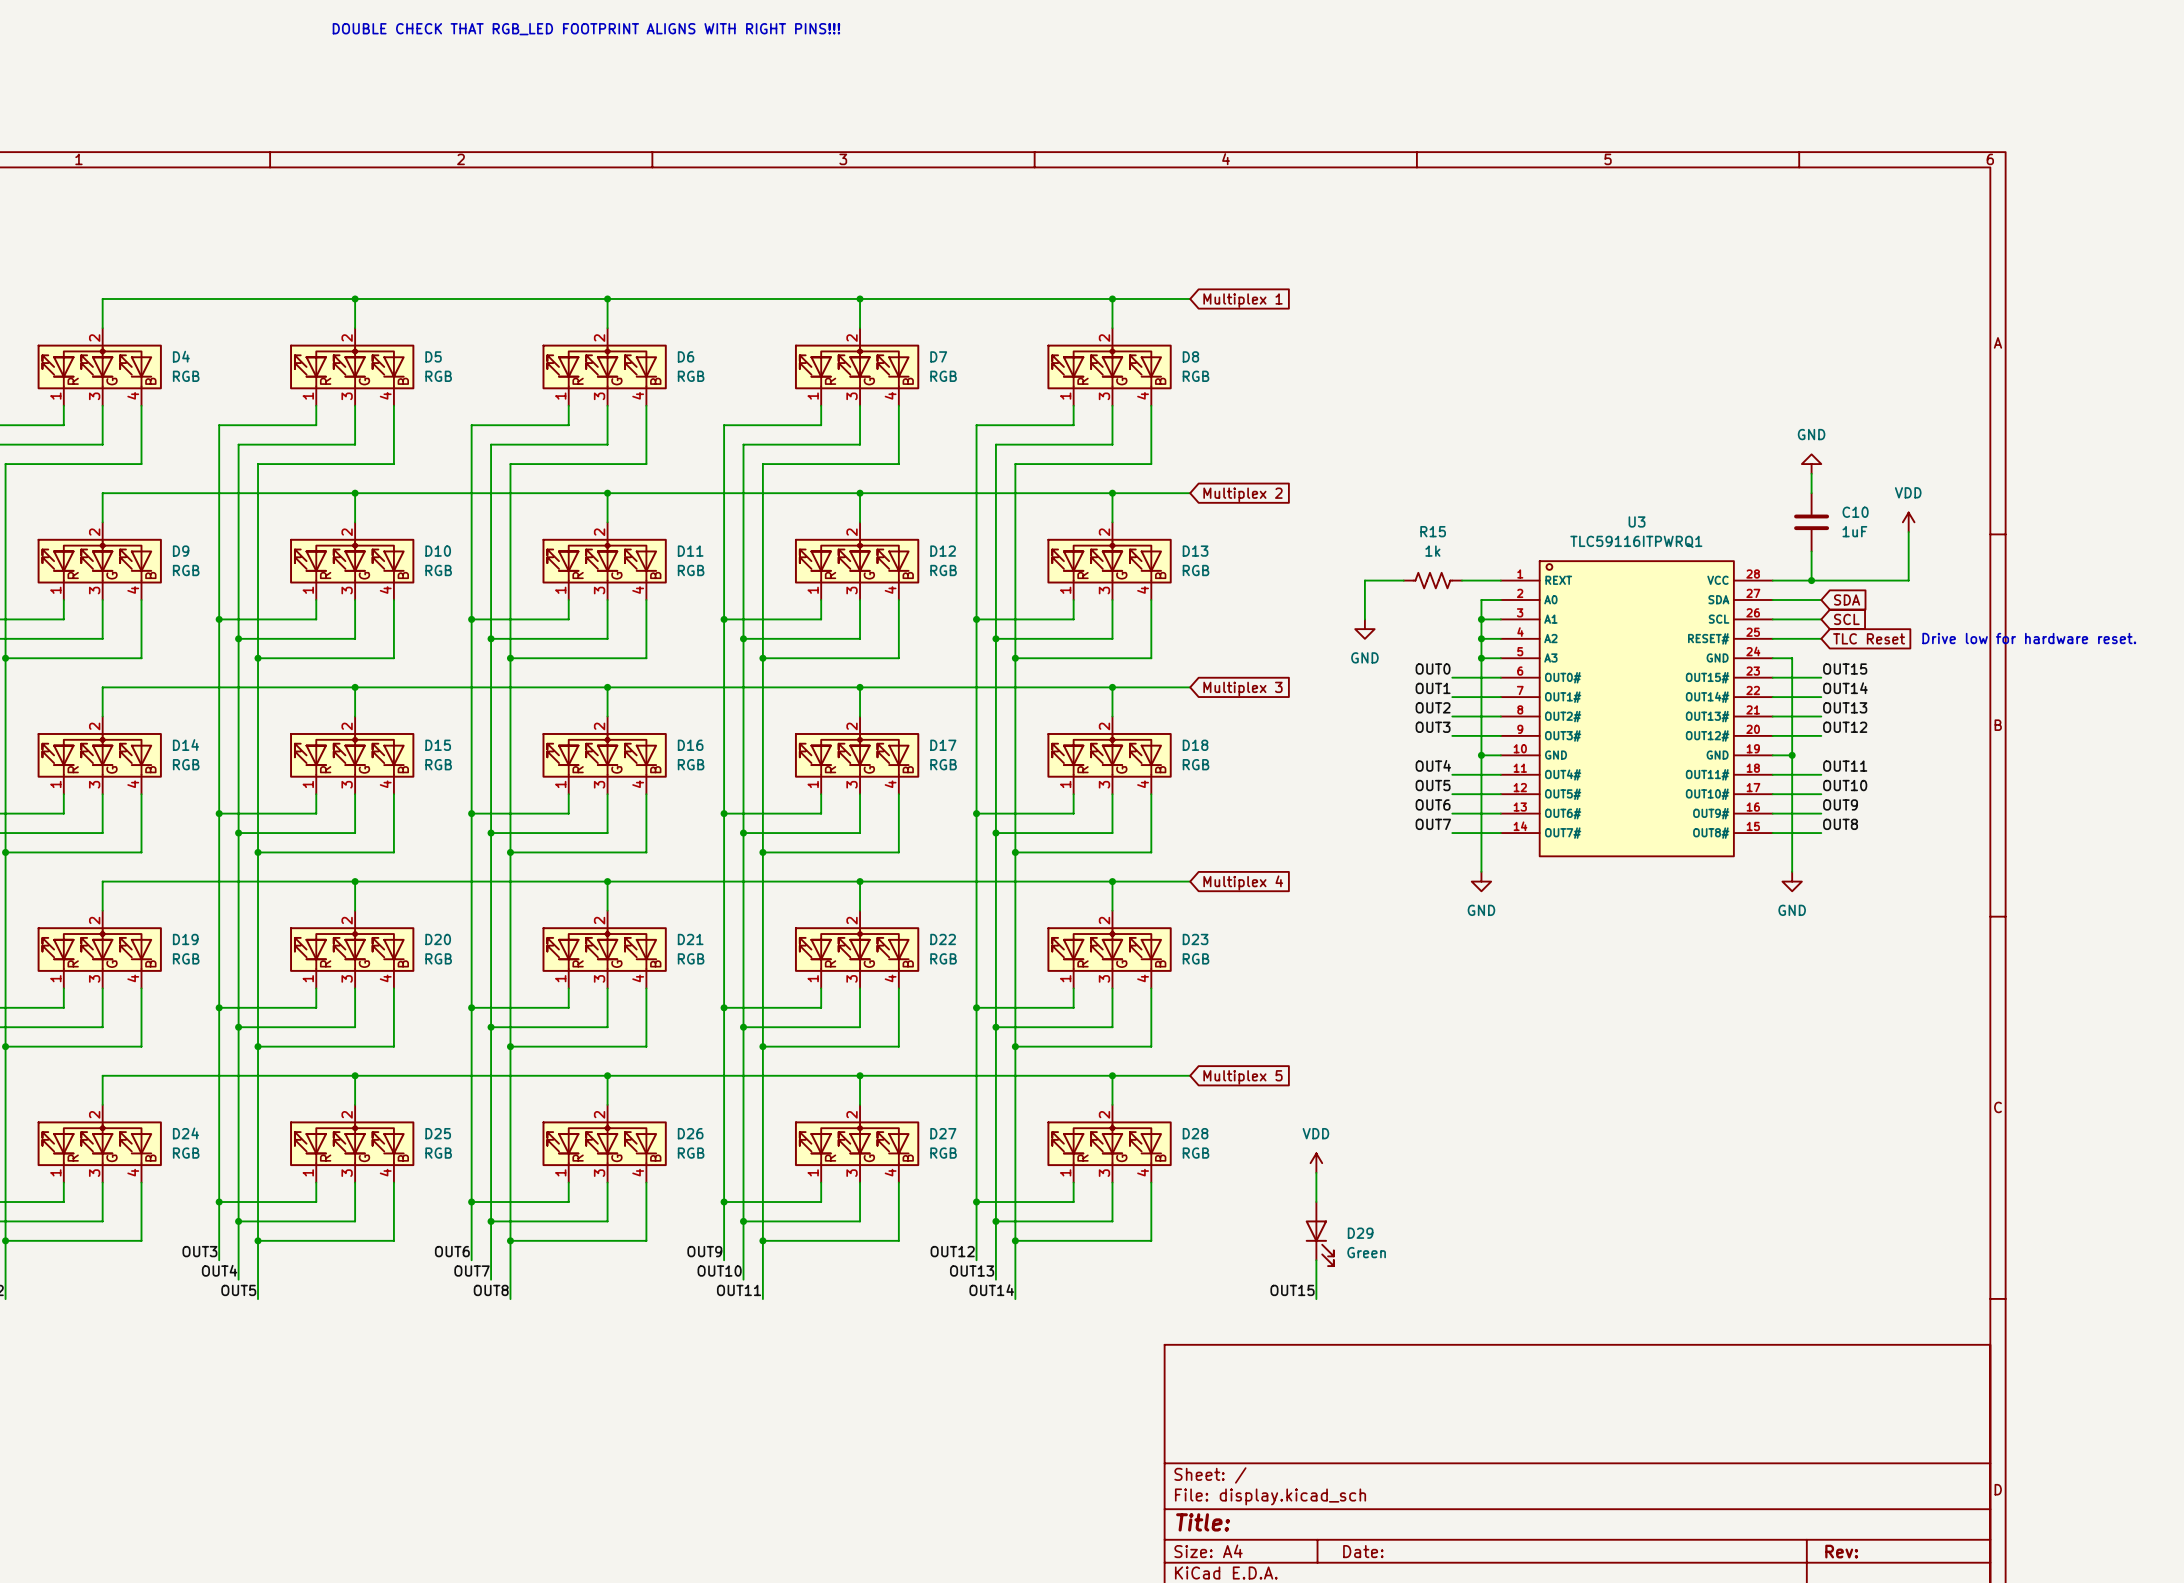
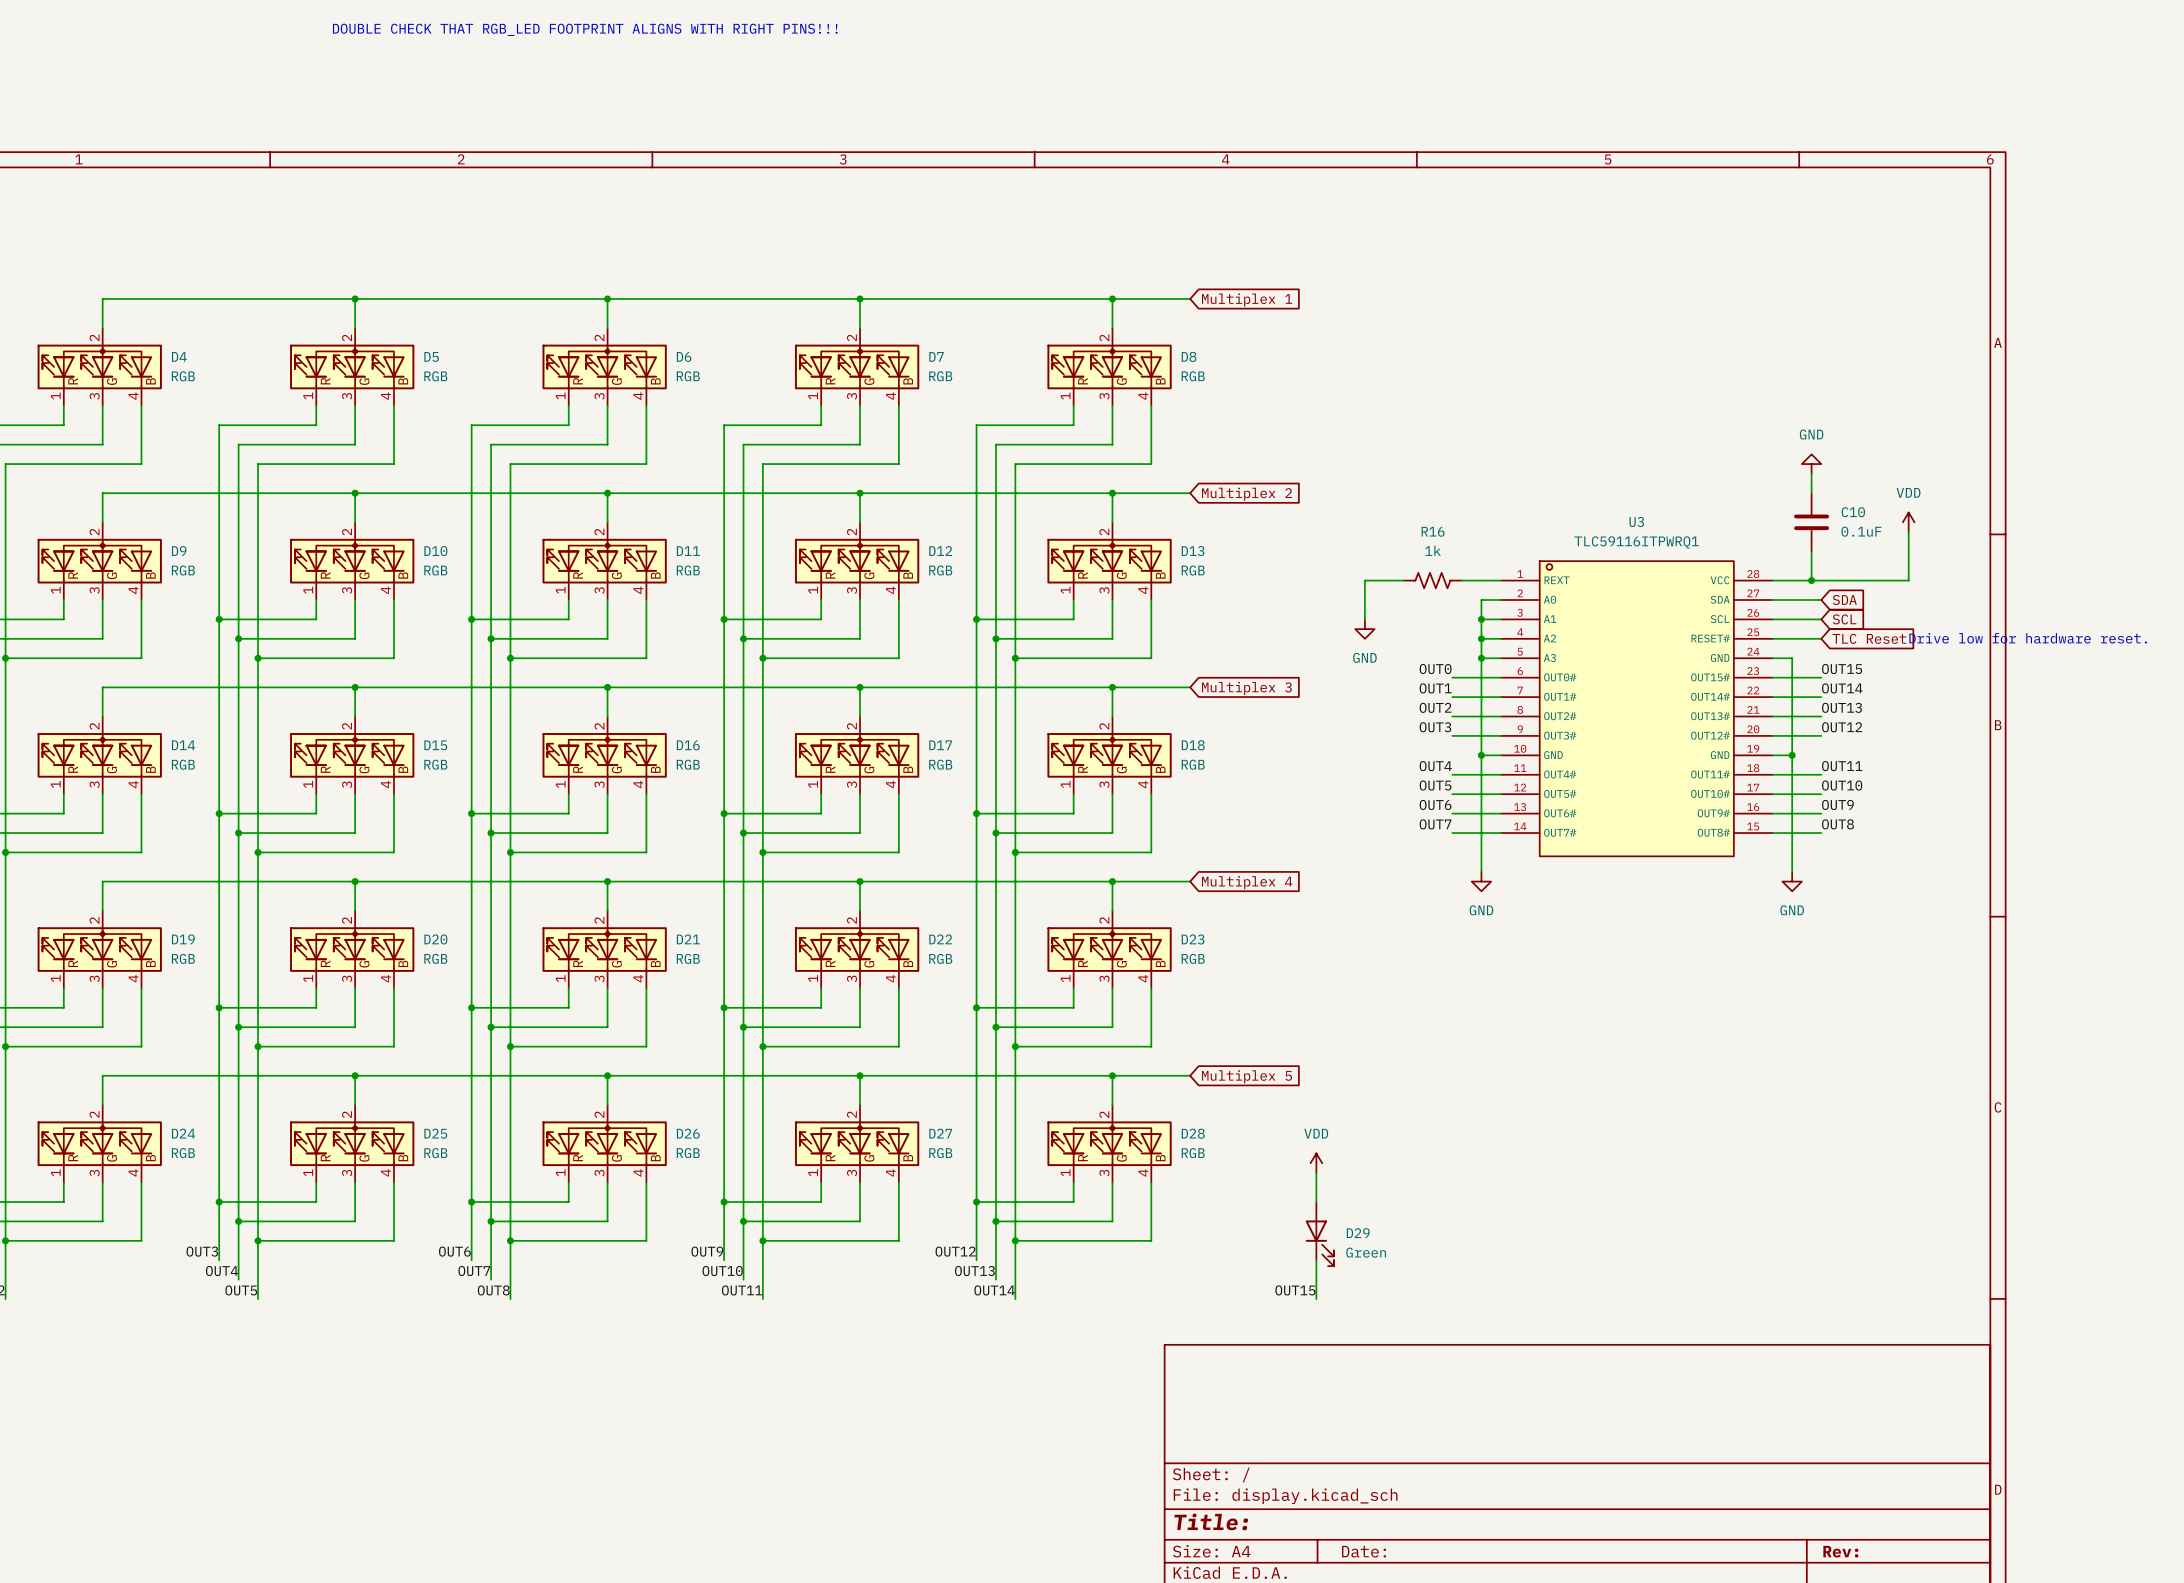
R15 name: R15 (1433, 531) -> R16 (1433, 531)
C10 value: 1uF (1854, 531) -> 0.1uF (1861, 531)

